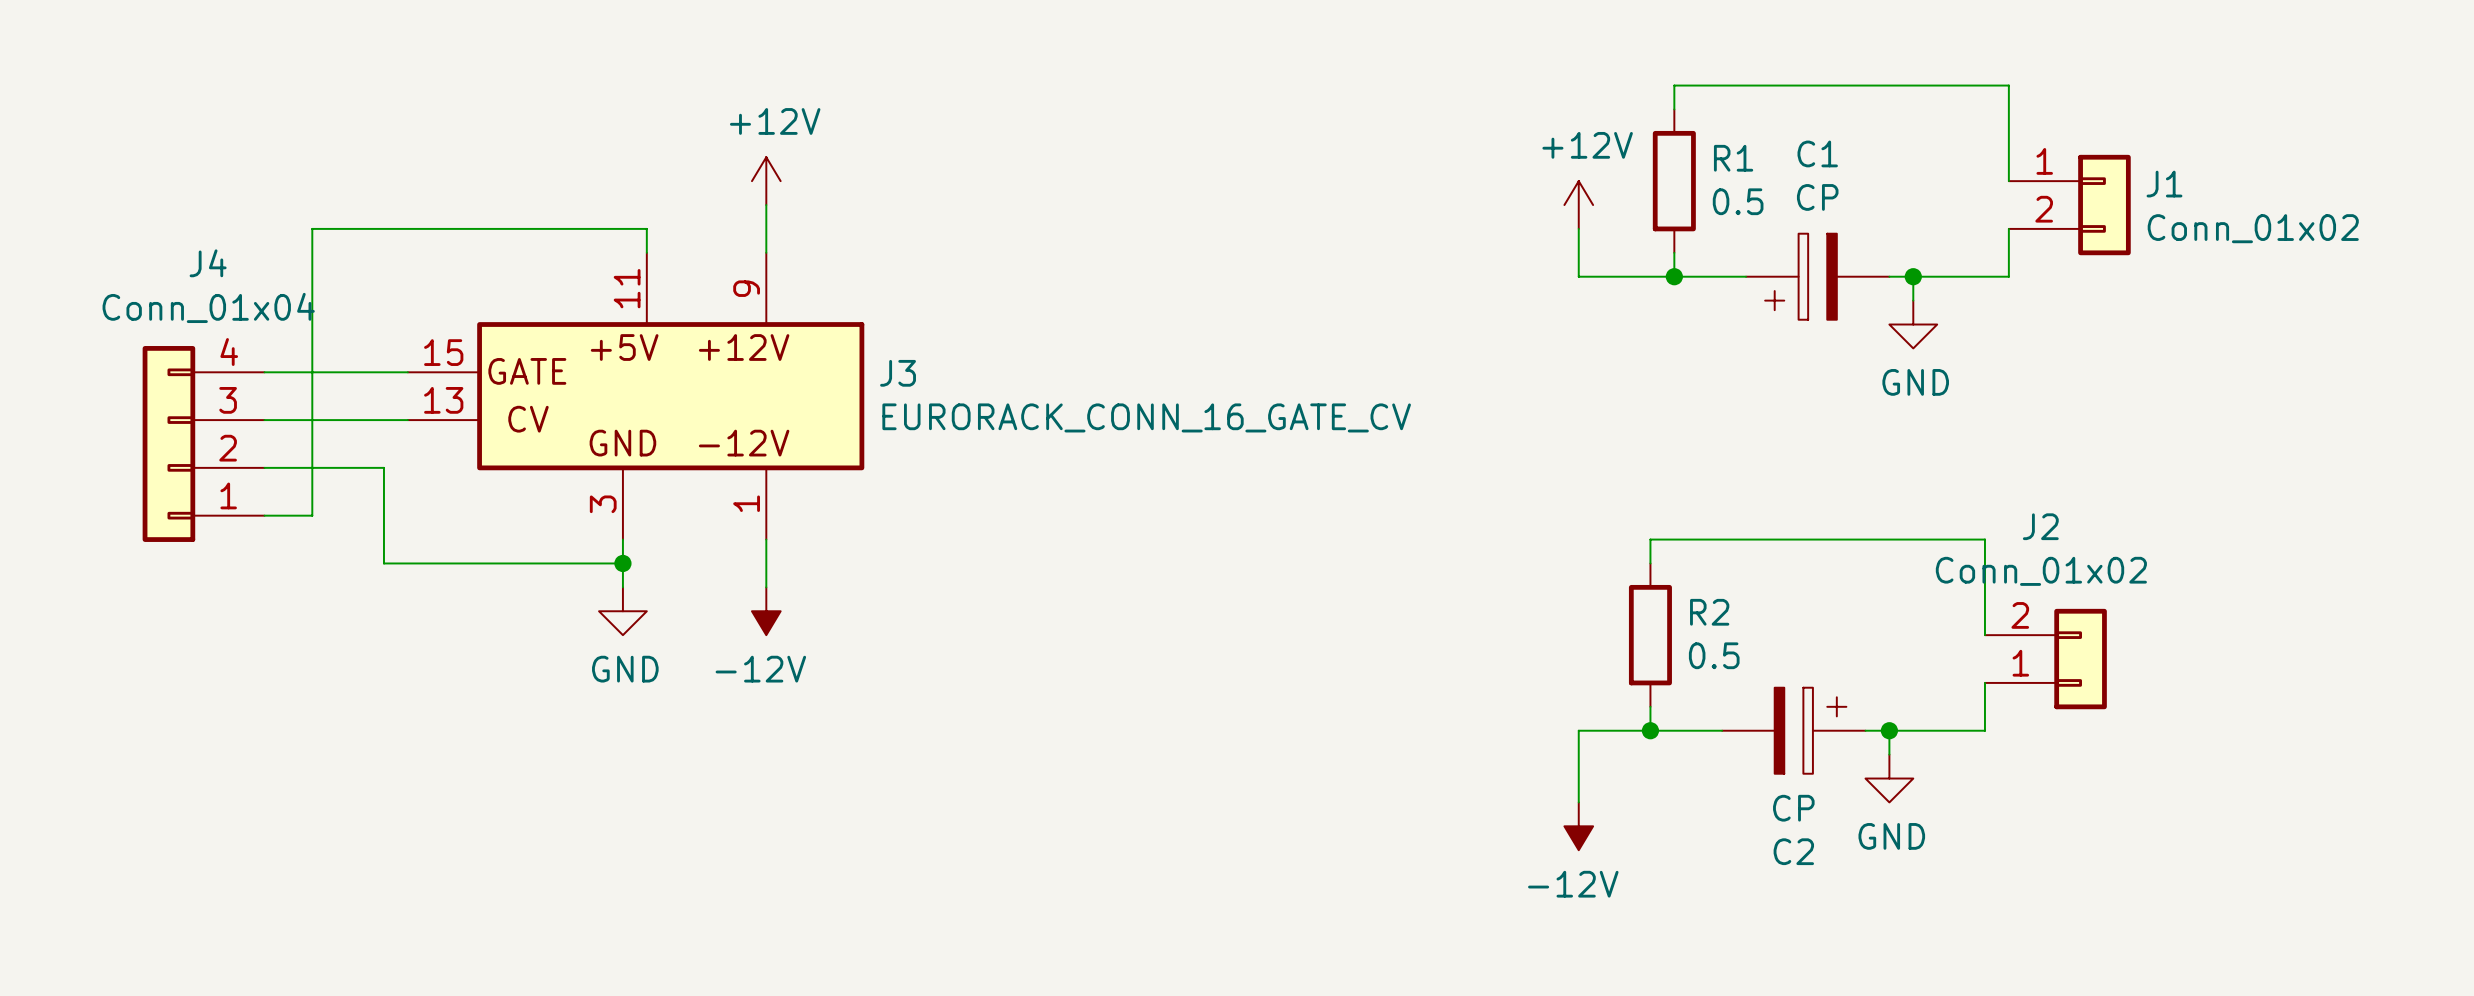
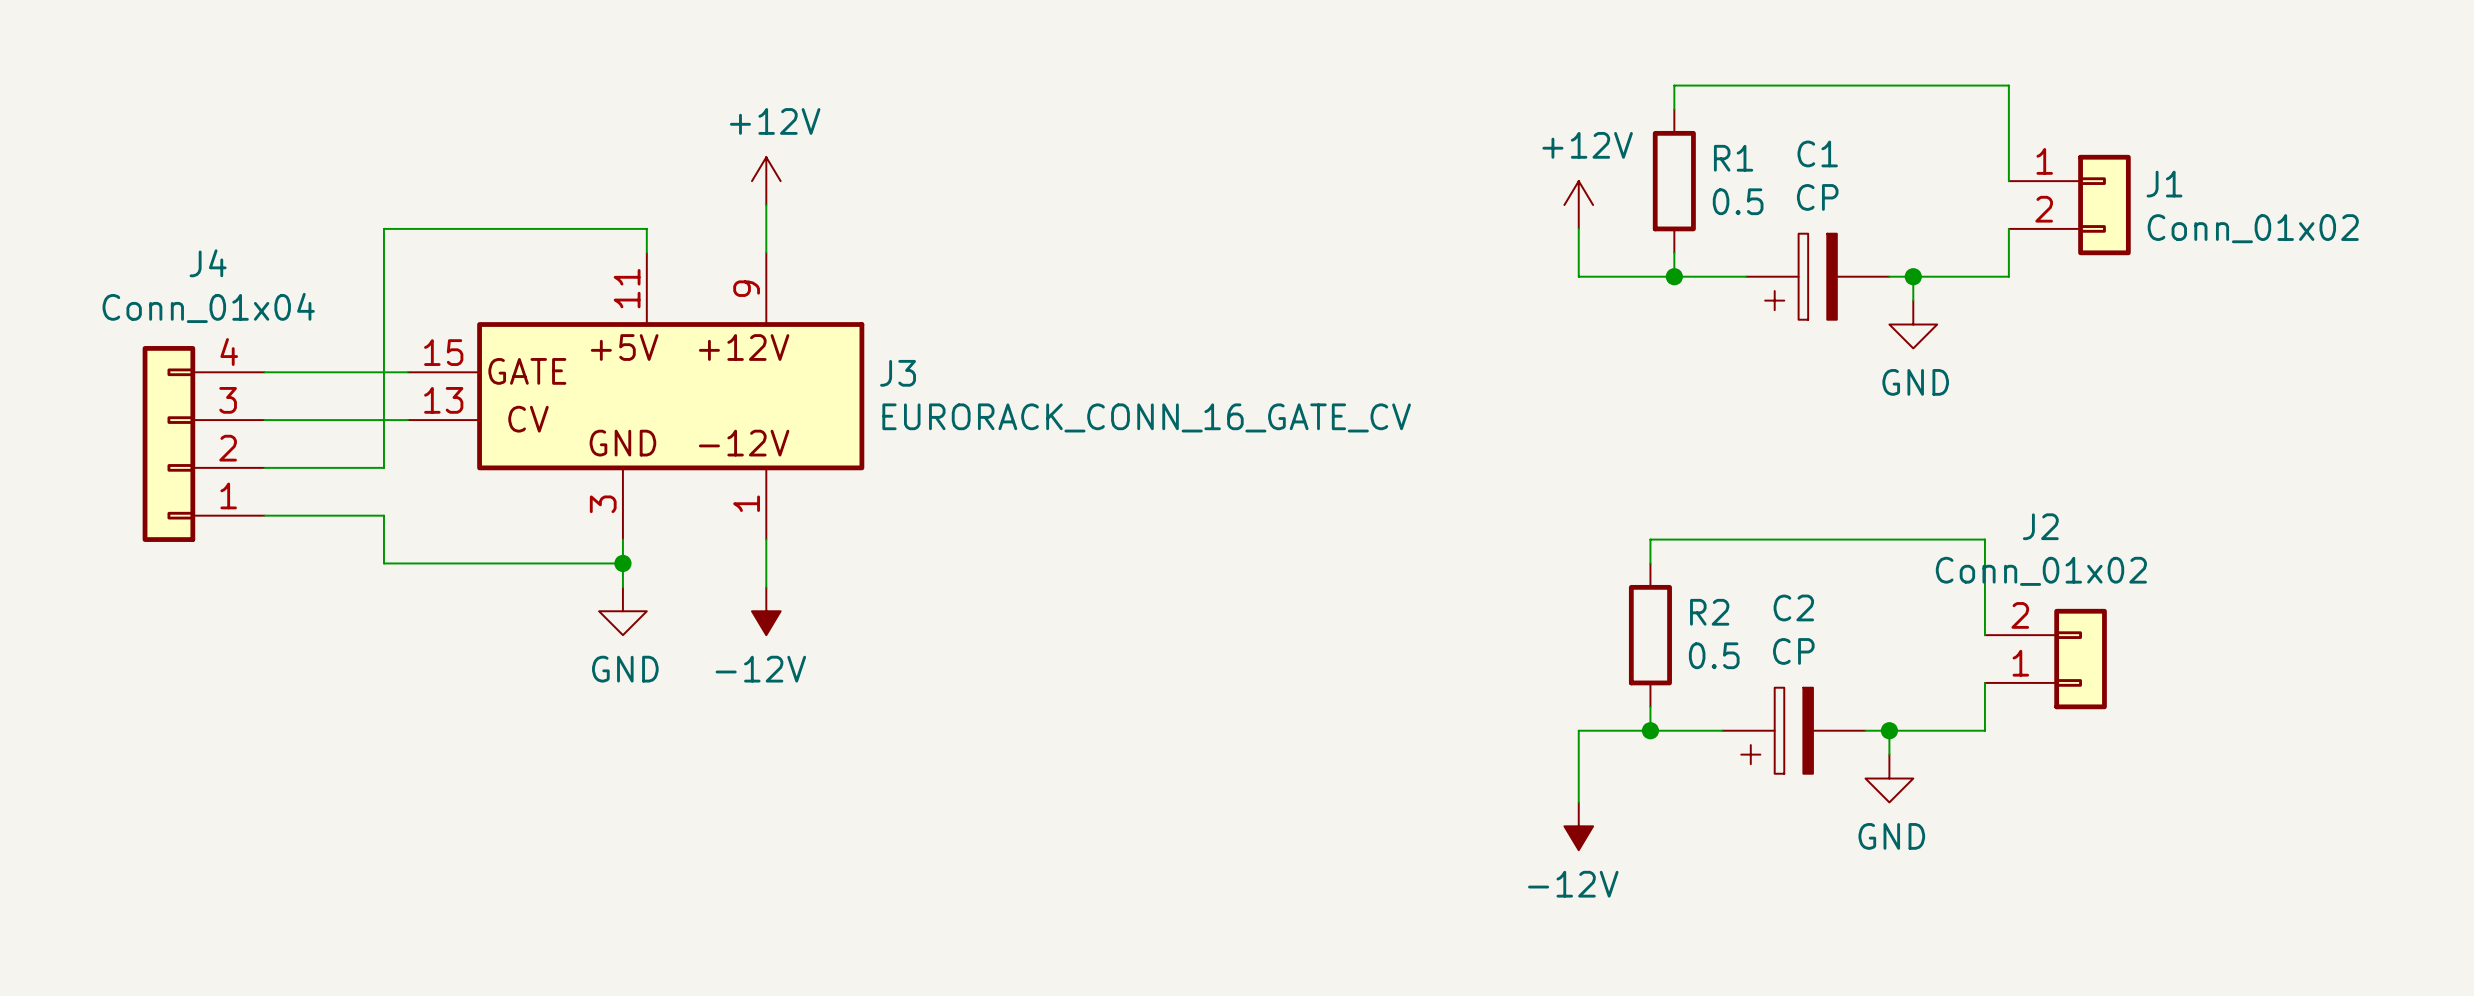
wire: (383, 228) (312, 228) (312, 515) -> (383, 228) (383, 467)
wire: (383, 467) (383, 515) -> (312, 515) (383, 515)
C2 rotation: 0° (1810, 730) -> 180° (1777, 730)

